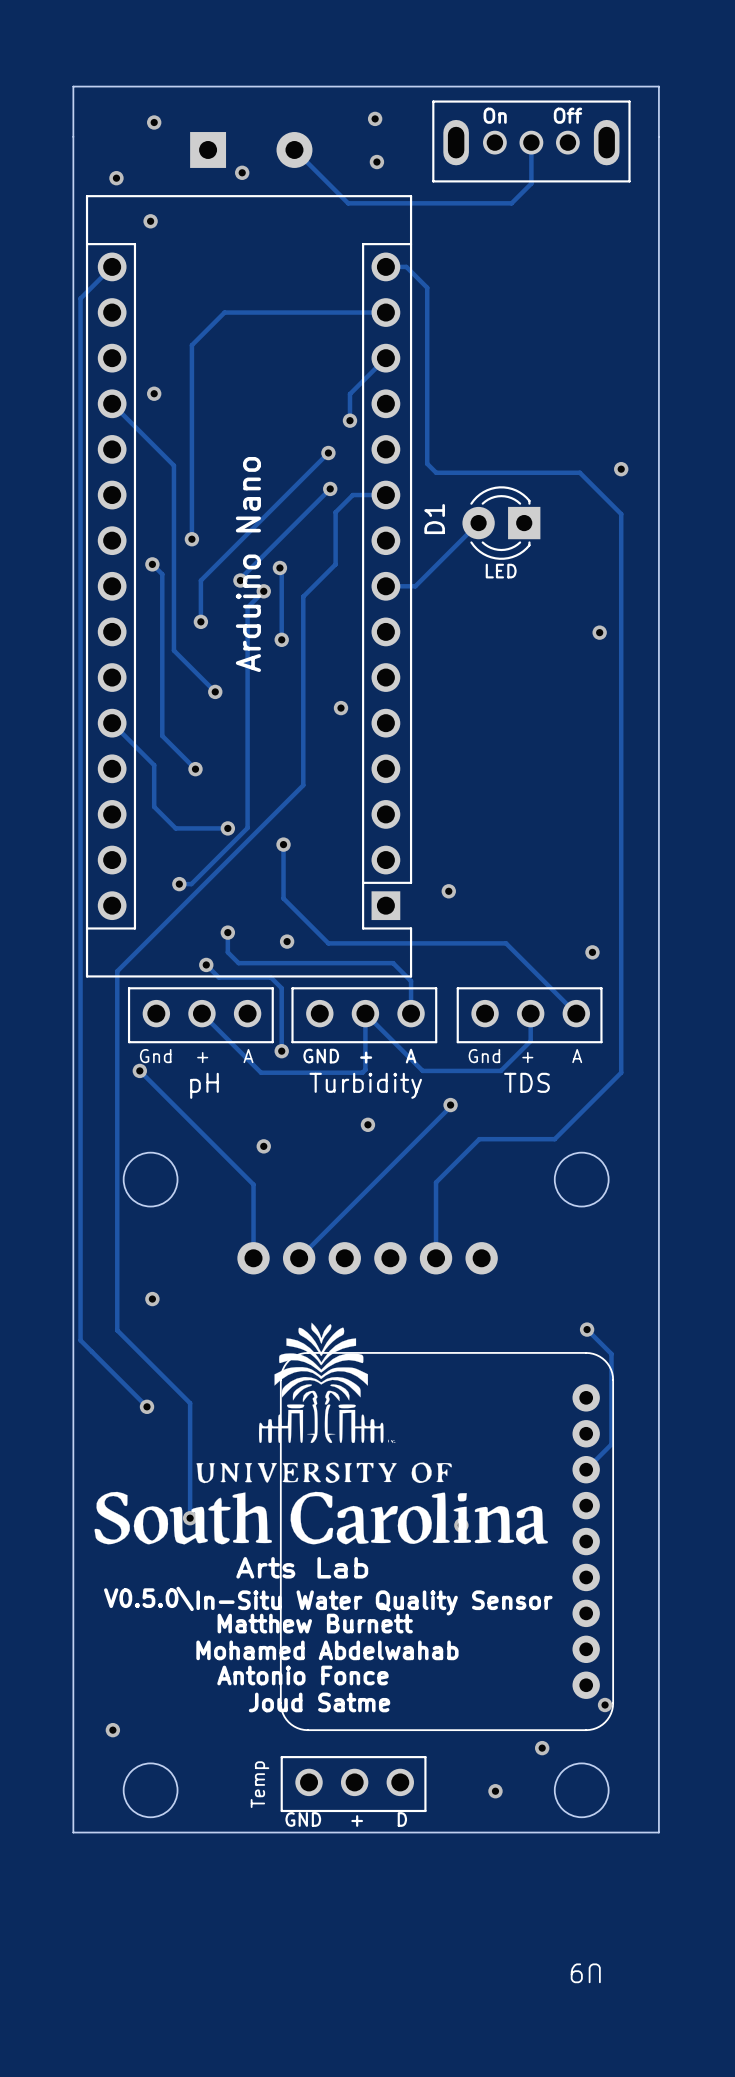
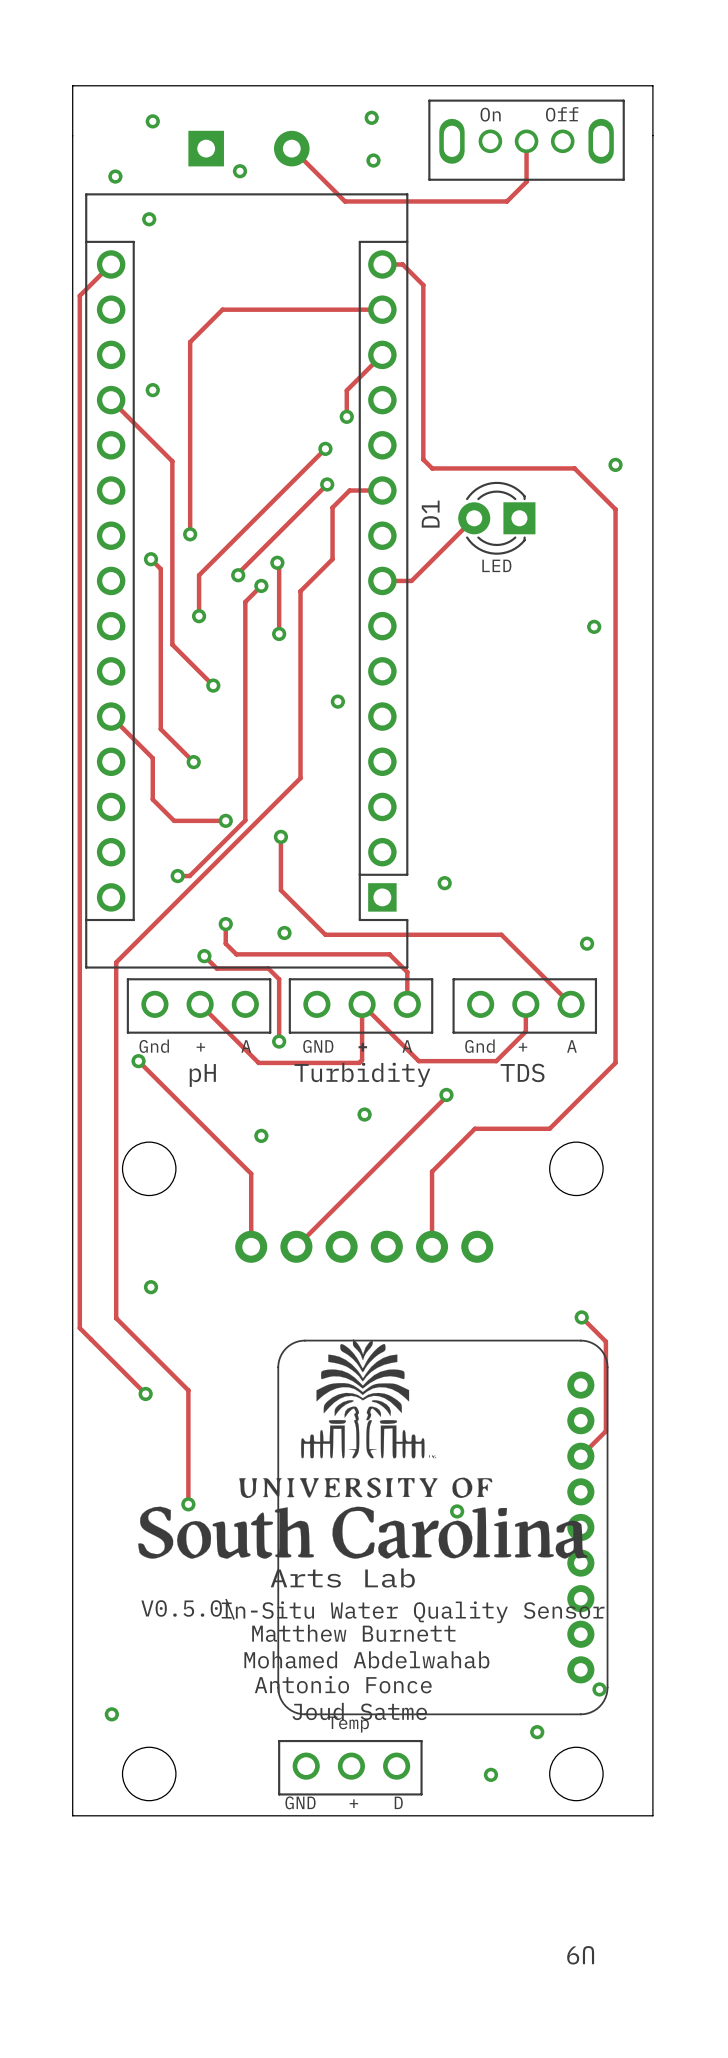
text: Arduino Nano (248, 564) -> none
drawing position: (321, 1433) -> (362, 1448)
text position: Arts Lab (302, 1567) -> Arts Lab (342, 1578)
text position: V0.5.0\ (148, 1598) -> V0.5.0\ (188, 1609)
text position: In-Situ Water Quality Sensor (374, 1602) -> In-Situ Water Quality Sensor (413, 1612)
text position: Matthew Burnett (315, 1623) -> Matthew Burnett (353, 1633)
text position: Mohamed Abdelwahab (327, 1650) -> Mohamed Abdelwahab (366, 1659)
text position: Antonio Fonce (302, 1675) -> Antonio Fonce (343, 1684)
text position: Joud Satme (319, 1702) -> Joud Satme (359, 1711)
part value rotation: 0° (260, 1784) -> 90° clockwise (348, 1724)
part value position: Temp (260, 1784) -> Temp (348, 1724)

